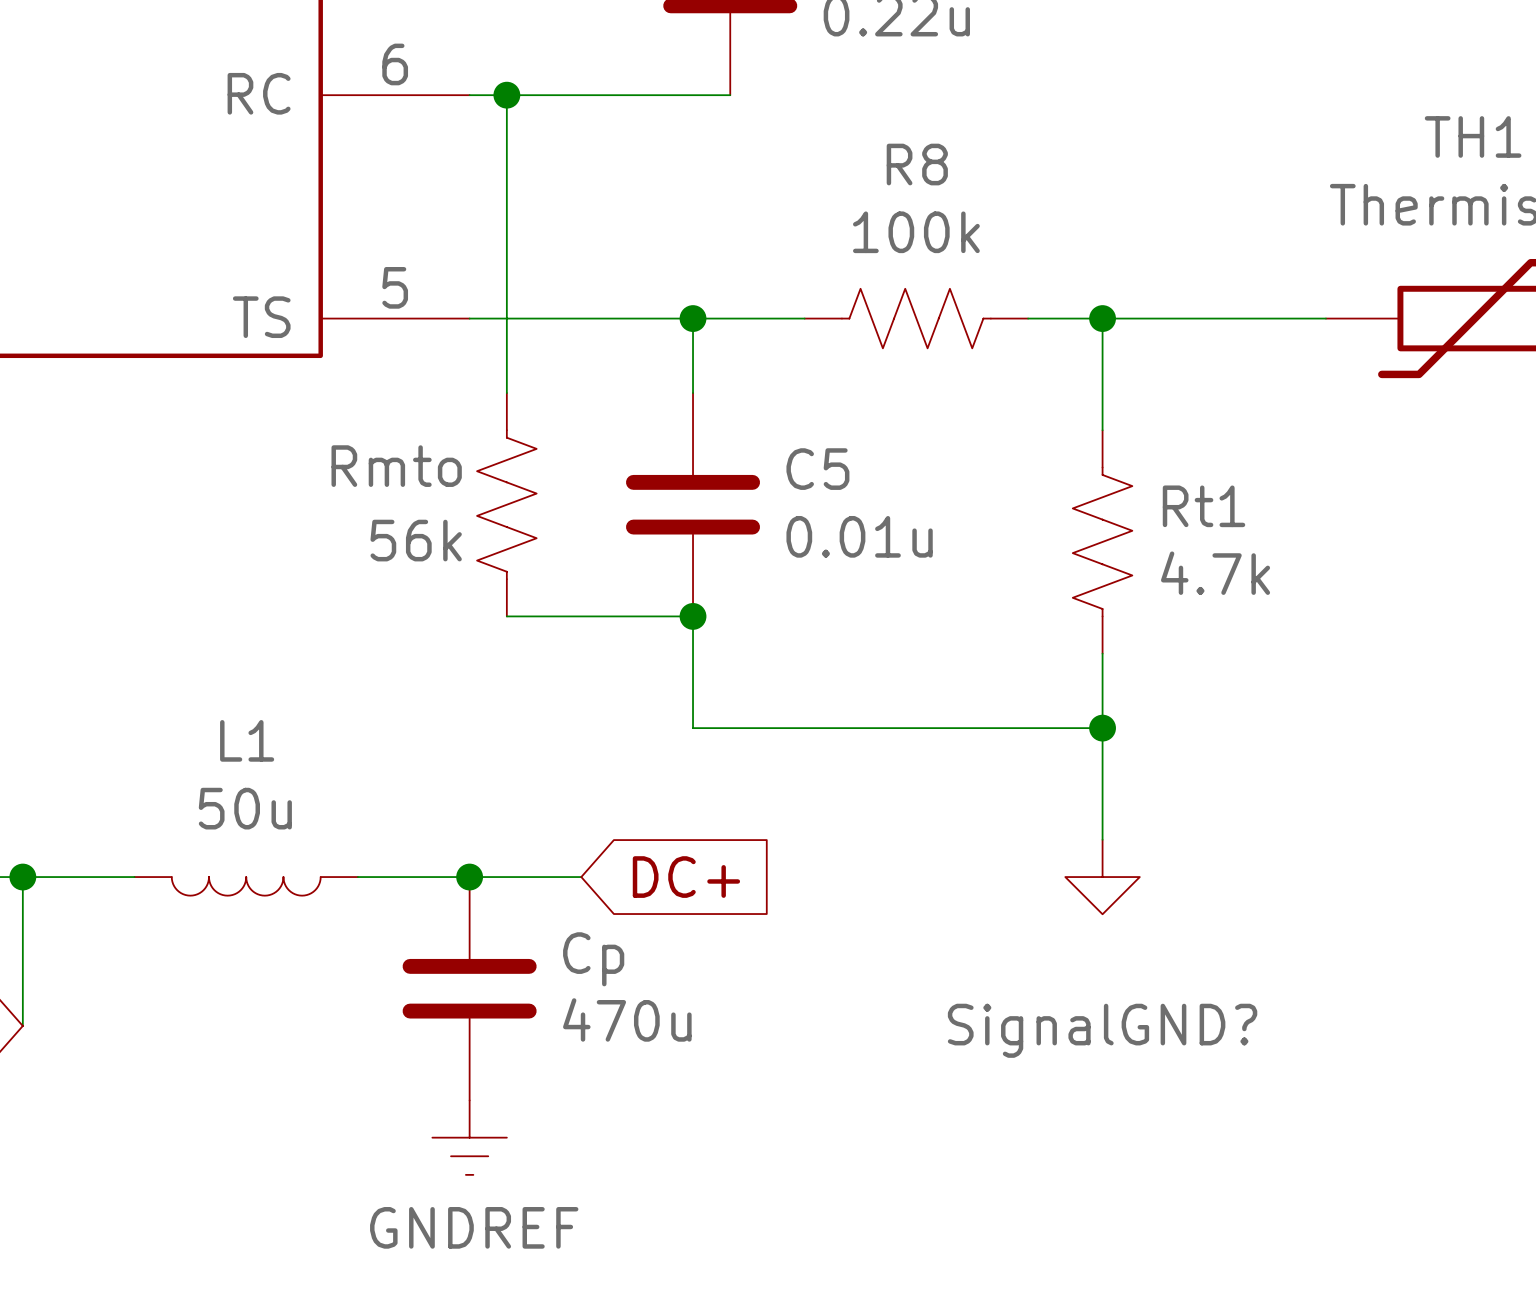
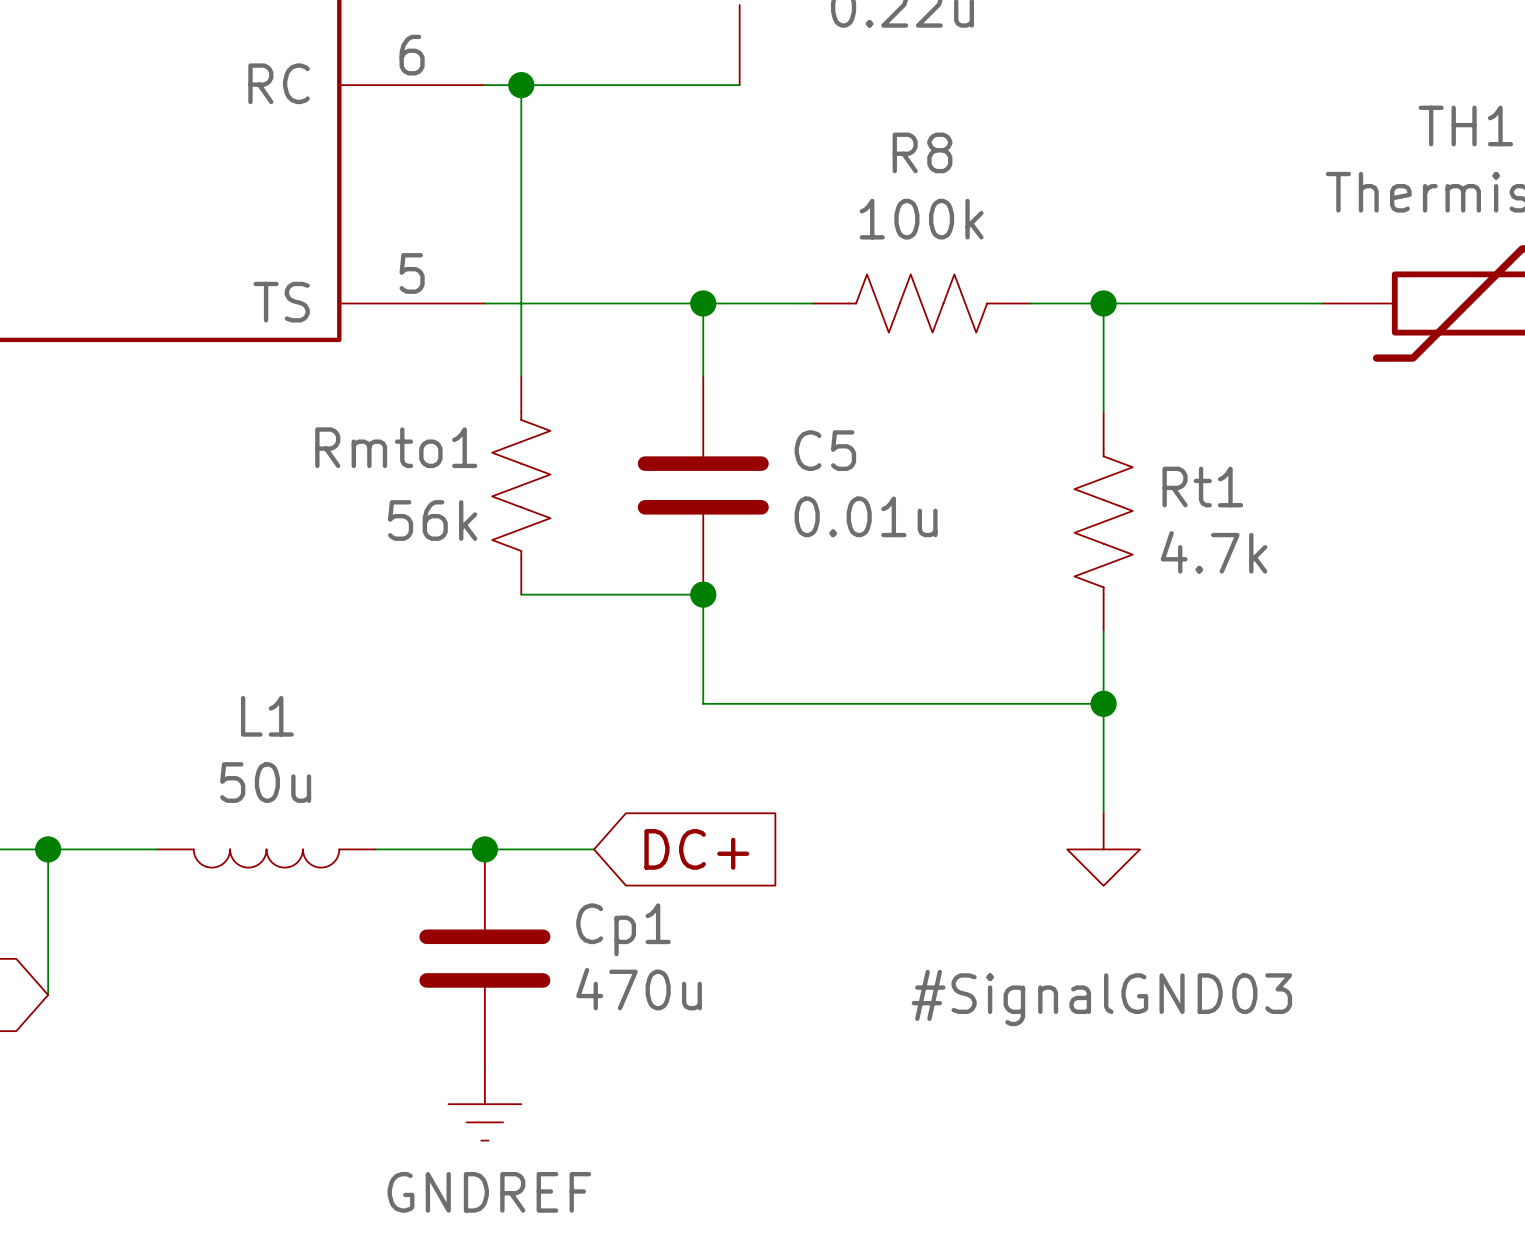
Rmto name: Rmto (396, 466) -> Rmto1 (396, 447)
Cp name: Cp (593, 959) -> Cp1 (623, 929)
SignalGND? name: SignalGND? (1102, 1030) -> #SignalGND03 (1101, 997)

